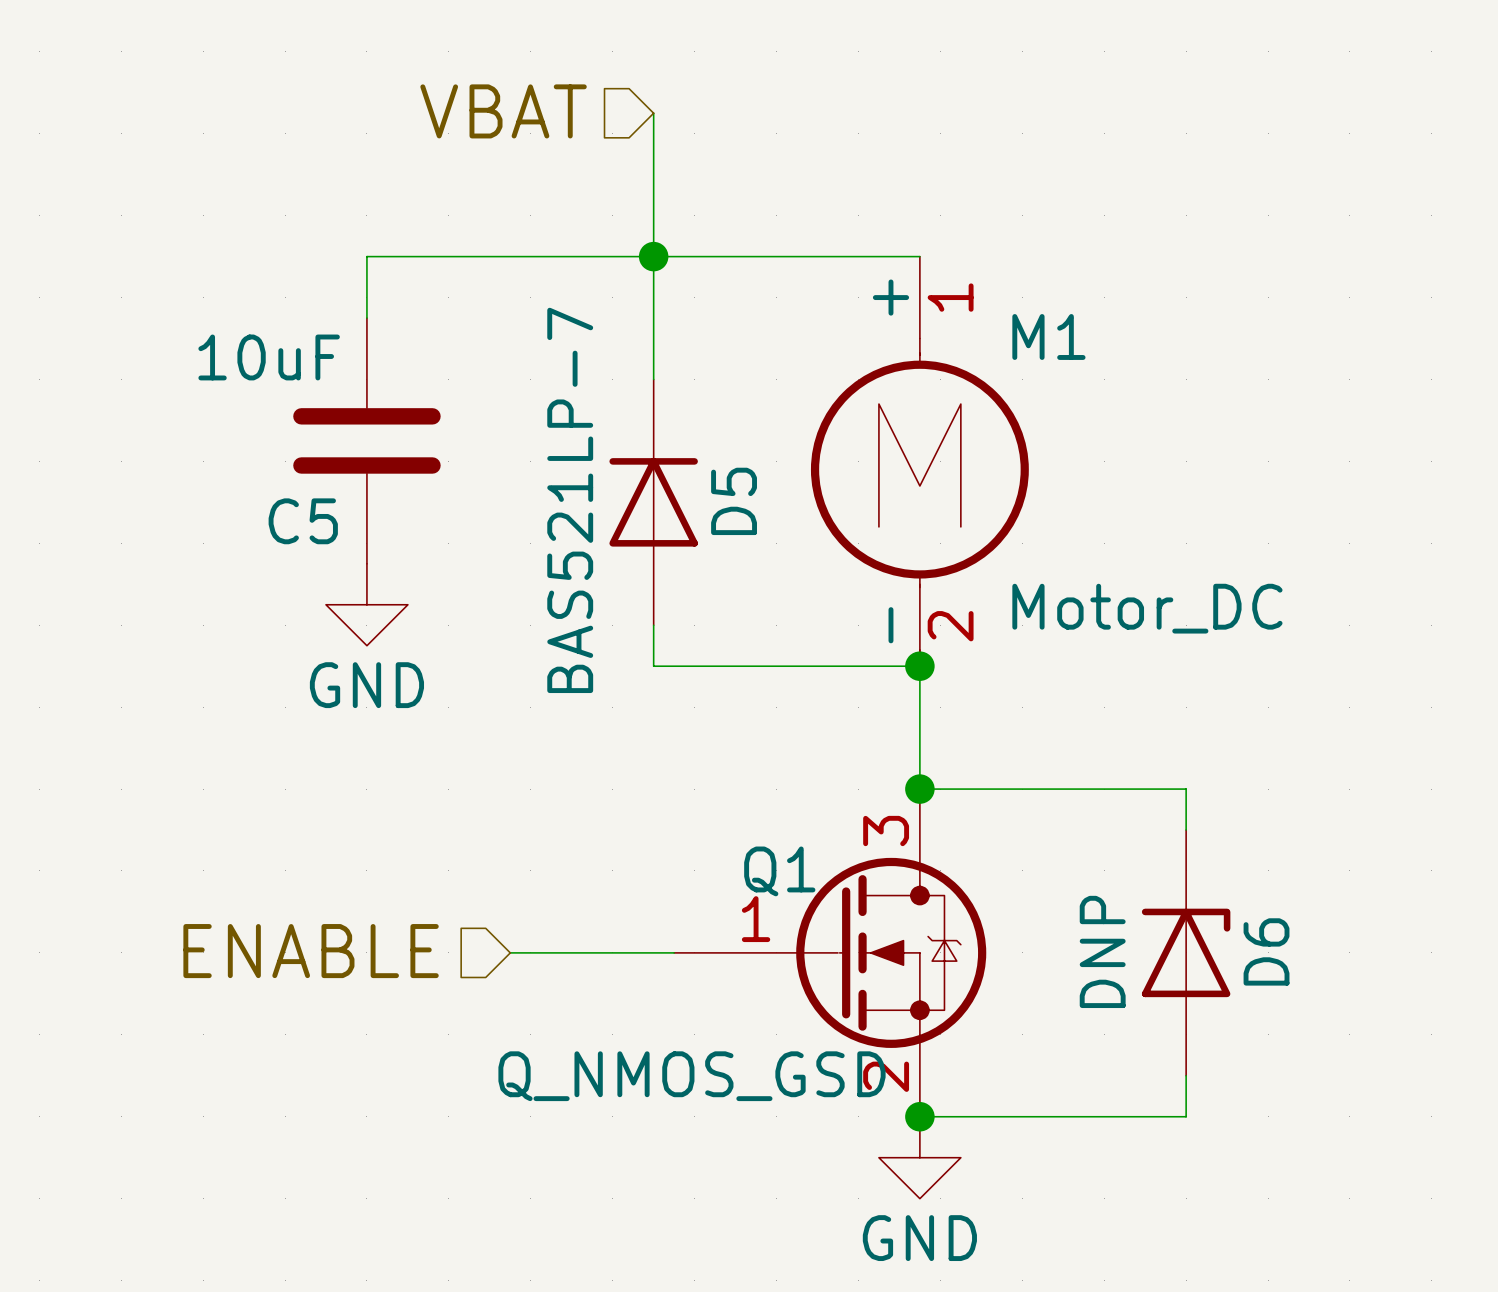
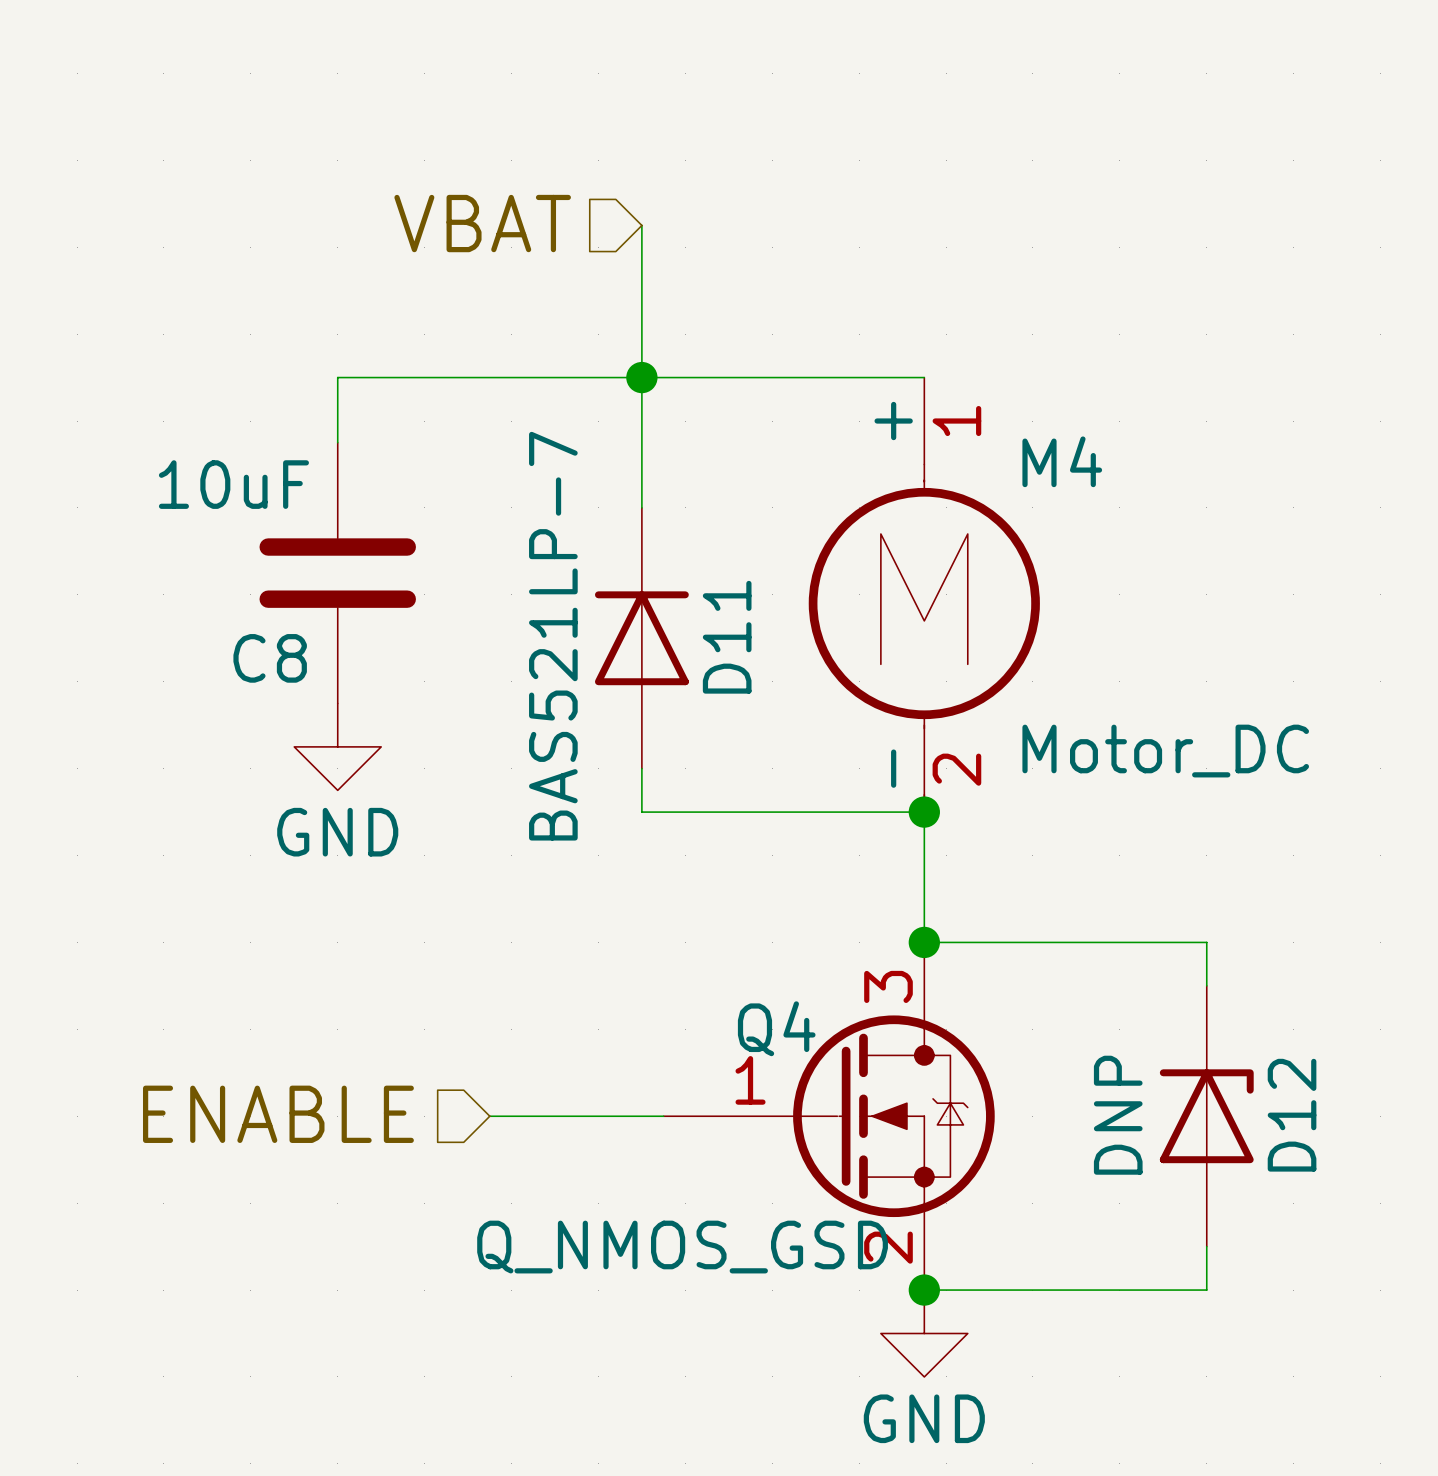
M1 name: M1 (1048, 336) -> M4 (1062, 461)
D5 name: D5 (734, 501) -> D11 (727, 637)
C5 name: C5 (303, 521) -> C8 (270, 658)
Q1 name: Q1 (779, 871) -> Q4 (776, 1028)
D6 name: D6 (1266, 951) -> D12 (1292, 1115)

